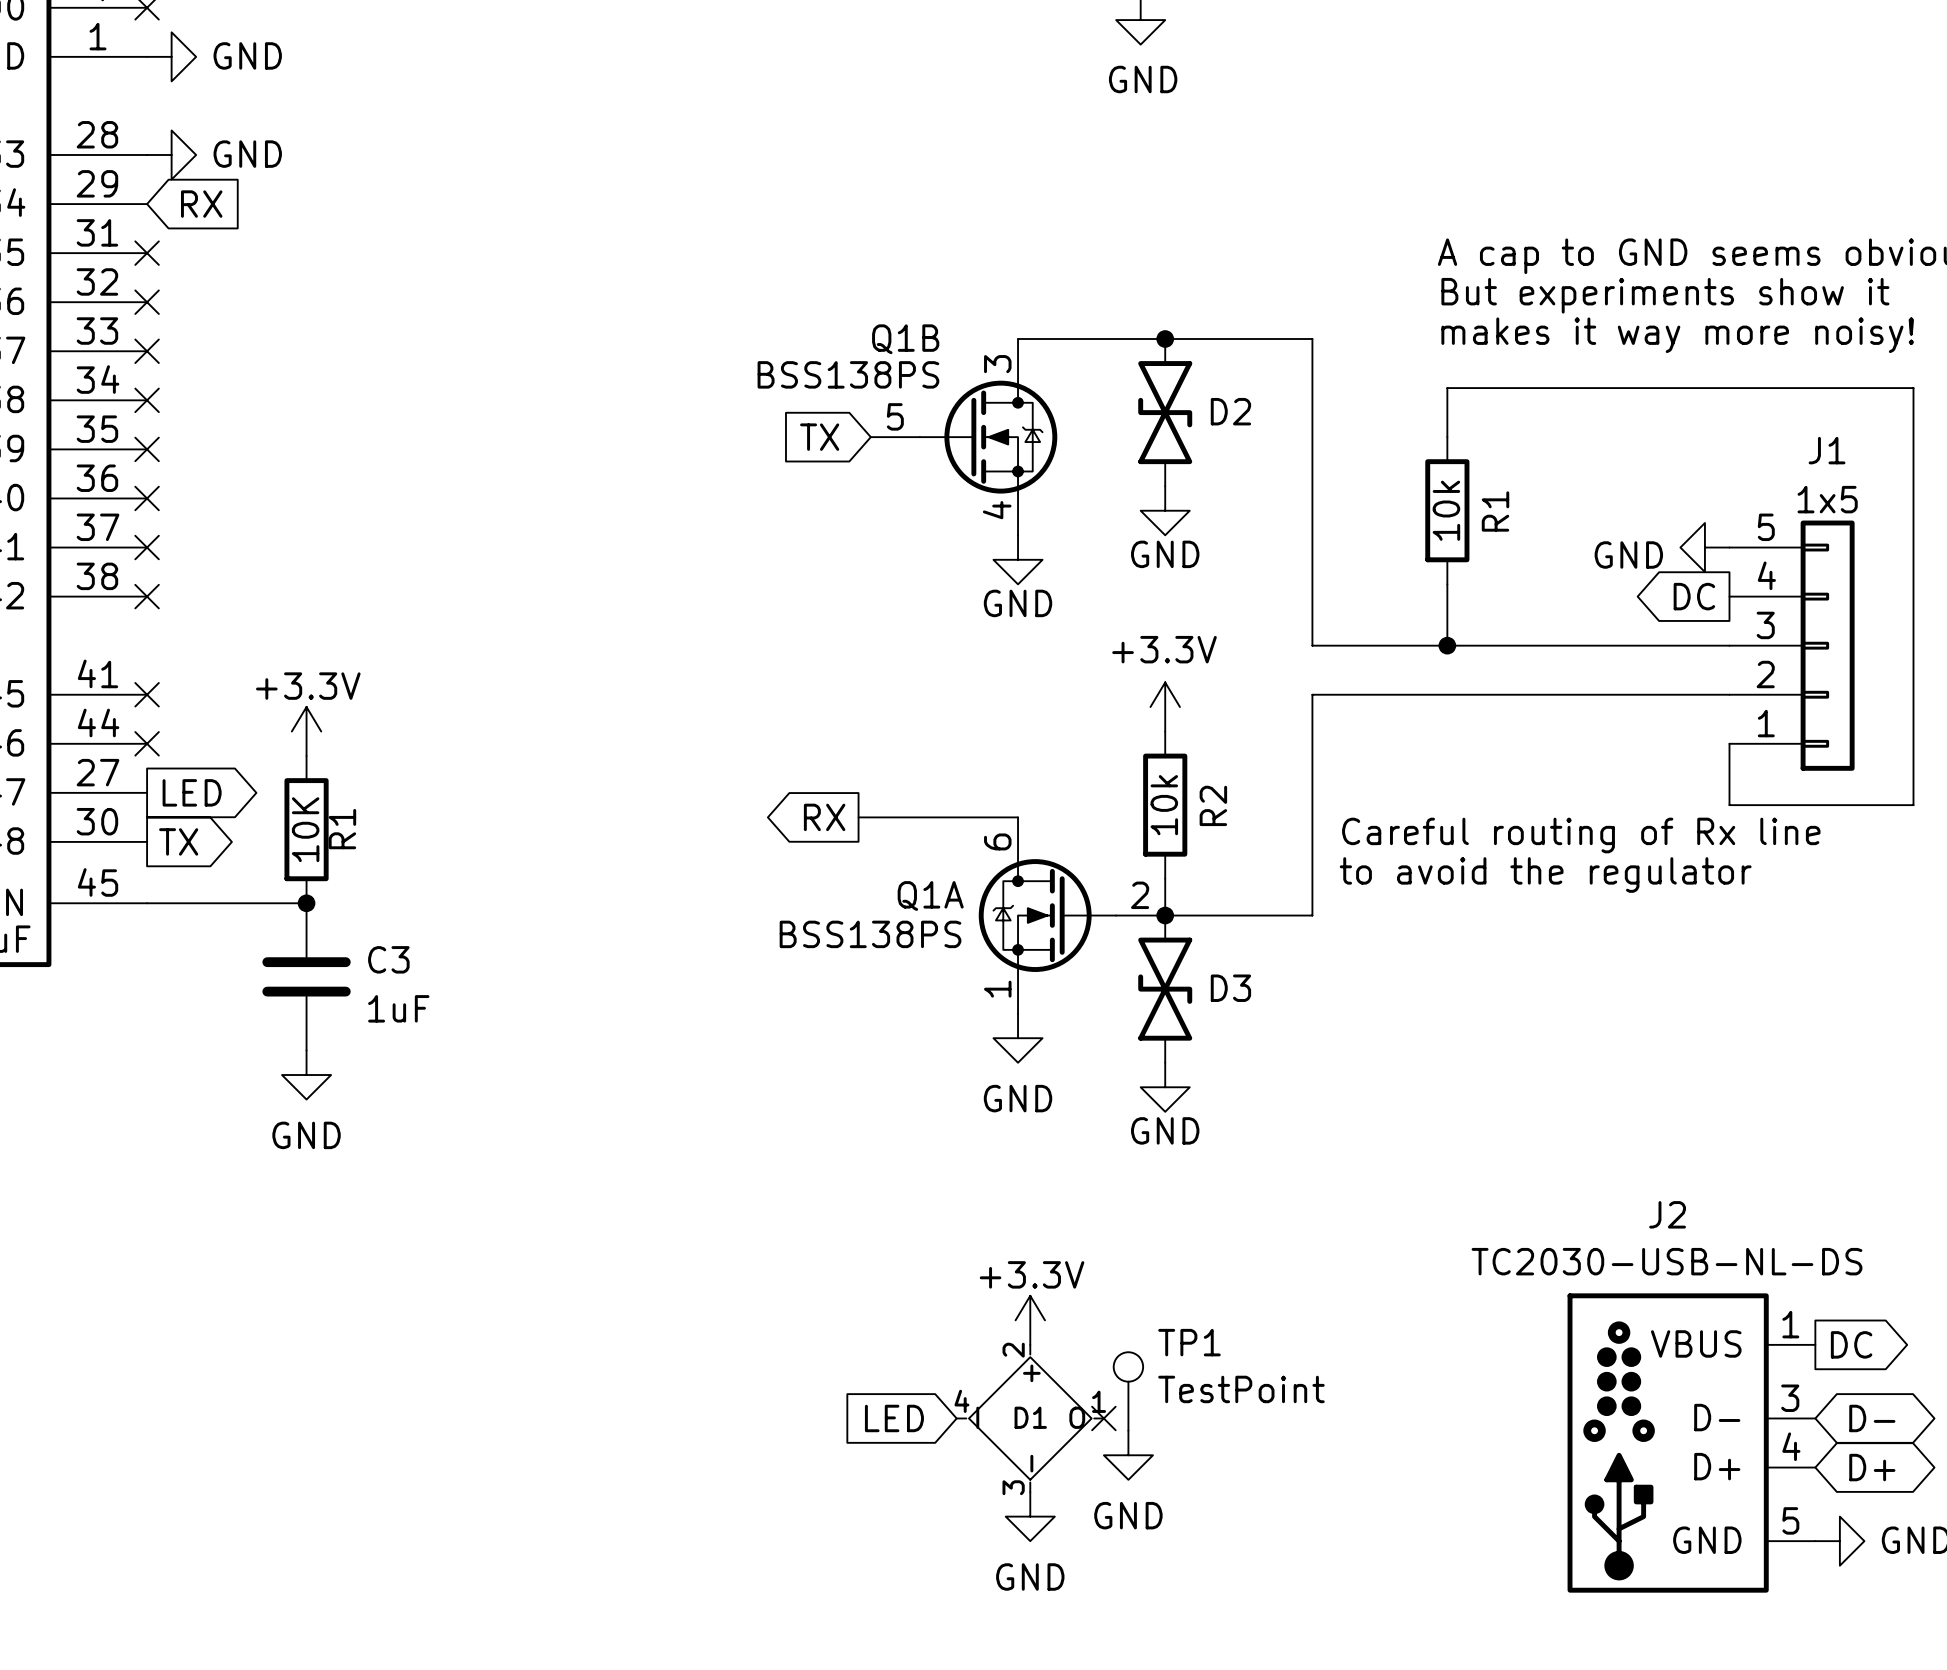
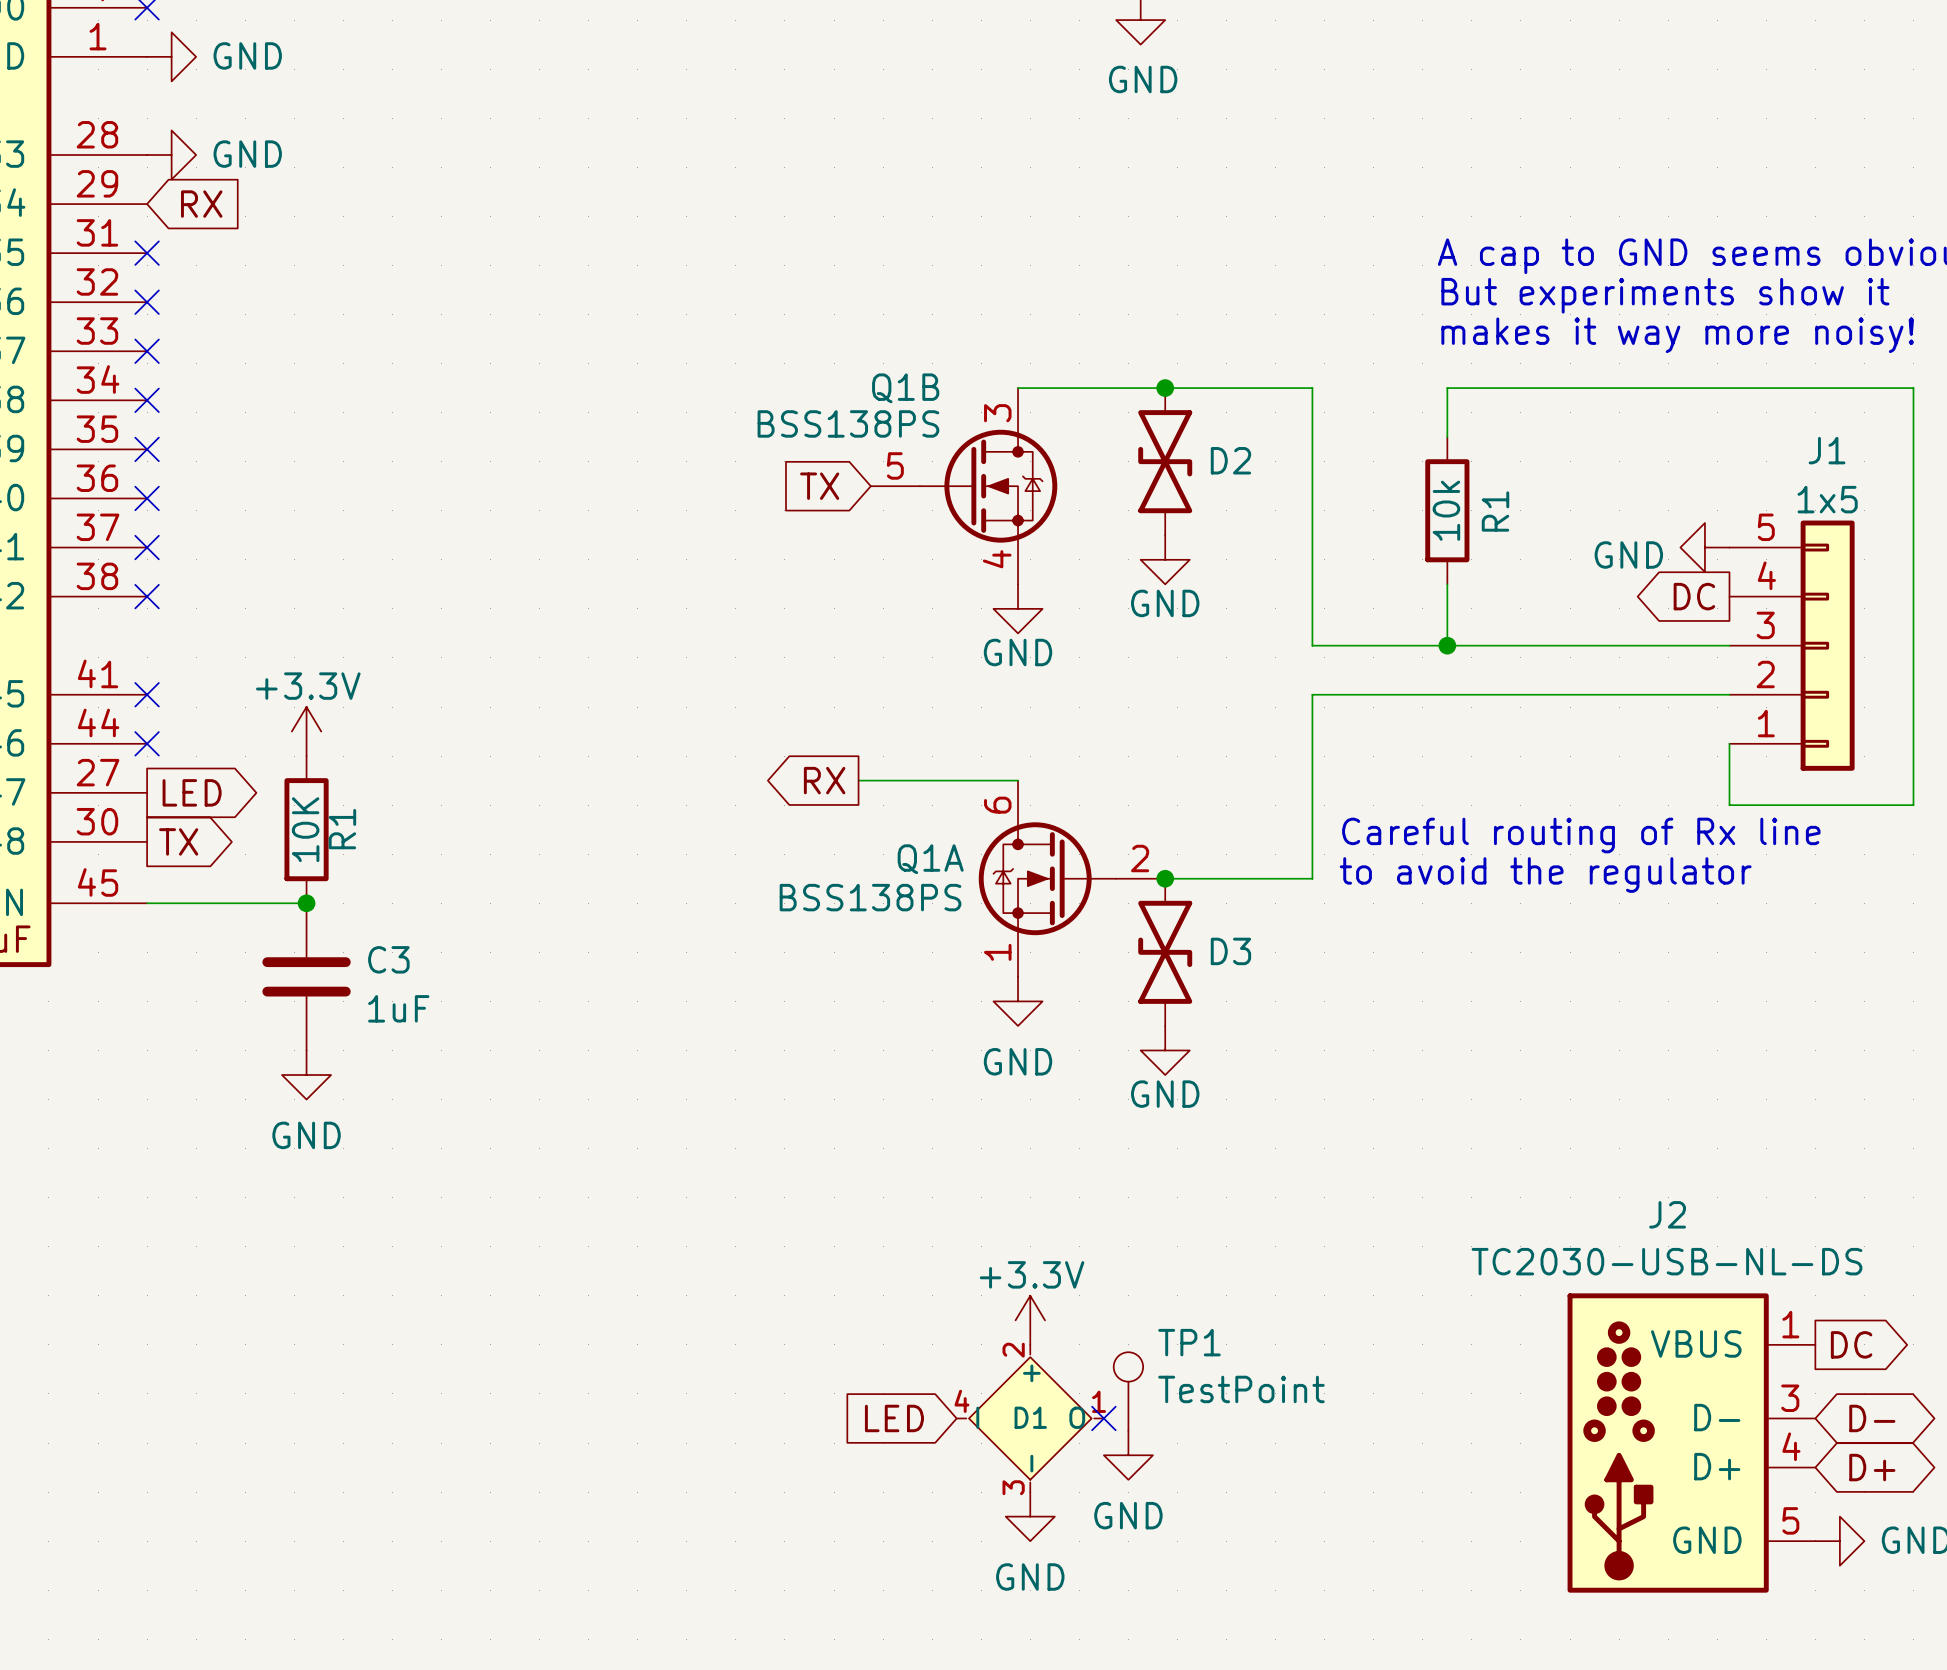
wire: (1018, 339) (1312, 339) (1312, 388) -> (1018, 388) (1312, 388)
junction position: (1165, 339) -> (1165, 388)
D2 position: (1165, 412) -> (1165, 461)
global label position: TX (819, 437) -> TX (819, 486)
Q1B position: (964, 437) -> (964, 486)
power symbol position: GND (1165, 510) -> GND (1165, 559)
power symbol position: GND (1018, 559) -> GND (1018, 608)
power symbol: +3.3V (1165, 707) -> none
R2: 10k (1165, 805) -> none
global label position: RX (824, 817) -> RX (824, 780)
wire: (858, 817) (1018, 817) -> (858, 780) (1018, 780)
wire: (1165, 878) (1165, 915) (1312, 915) (1312, 878) -> (1165, 878) (1312, 878)
Q1A position: (1071, 915) -> (1071, 878)
junction position: (1165, 915) -> (1165, 878)
D3 position: (1165, 989) -> (1165, 952)
power symbol position: GND (1018, 1038) -> GND (1018, 1001)
power symbol position: GND (1165, 1087) -> GND (1165, 1050)

